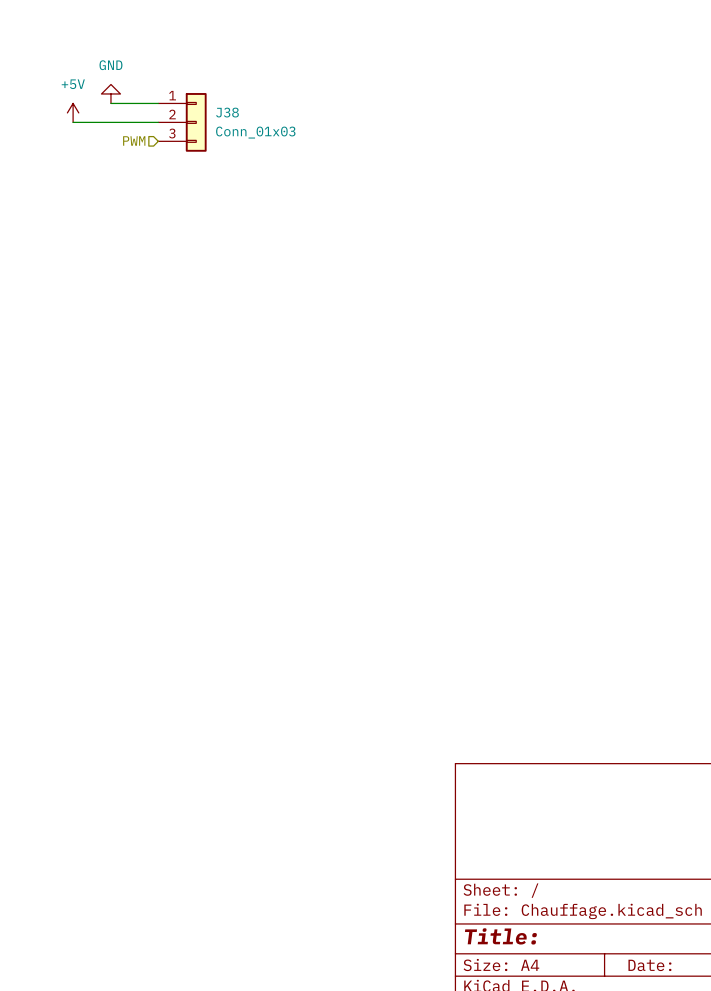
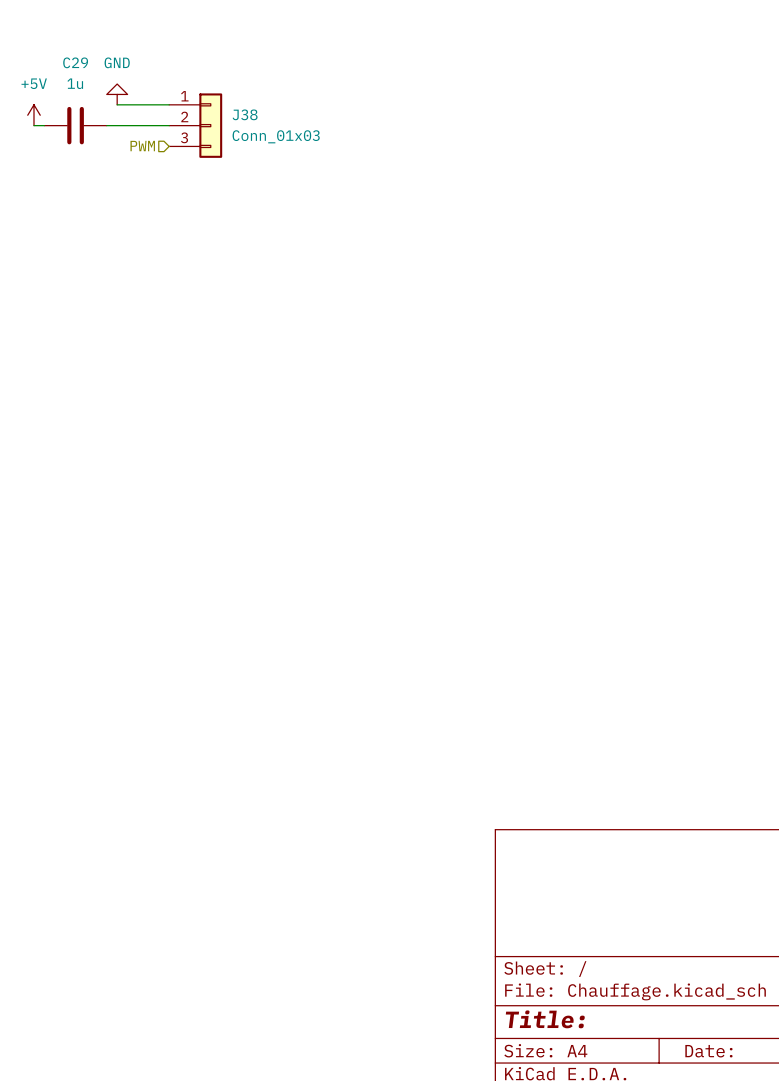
power symbol position: +5V (73, 112) -> +5V (33, 115)
wire: none -> (33, 125) (44, 125)
C29: none -> 1u (75, 125)

